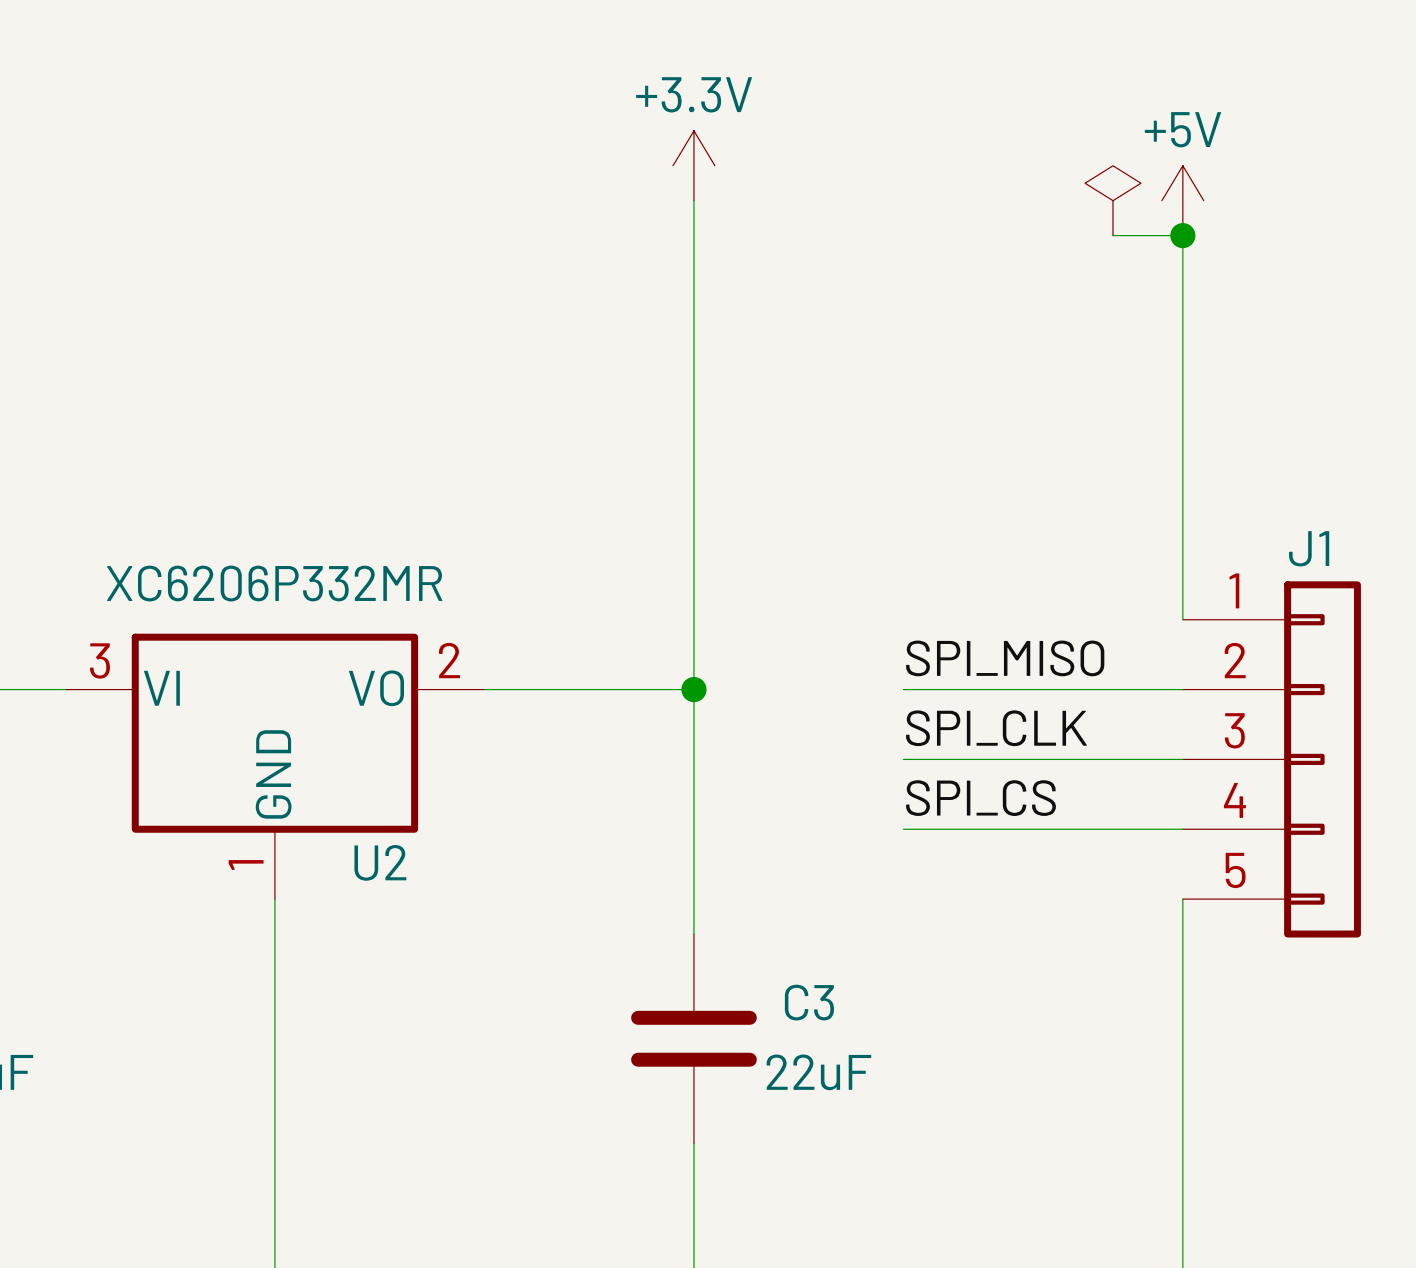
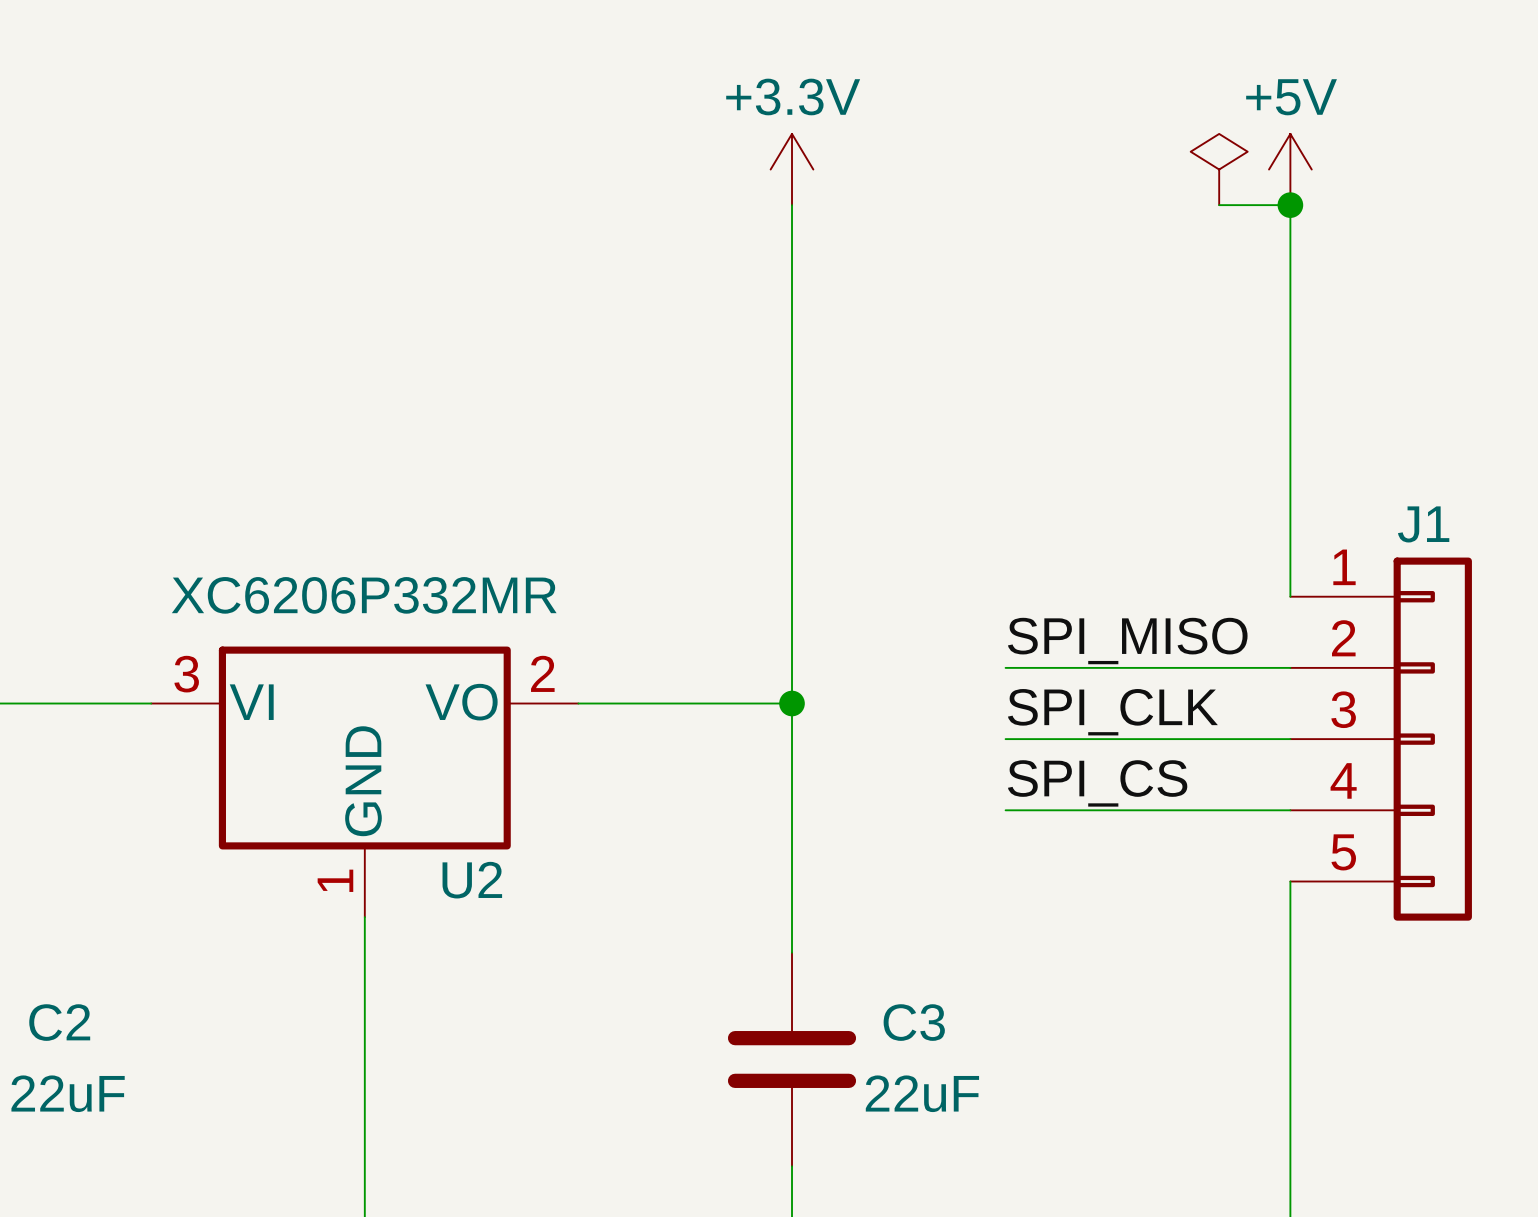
power symbol position: (1113, 200) -> (1219, 169)
power symbol position: +5V (1182, 200) -> +5V (1290, 169)
wire: (1113, 235) (1182, 235) -> (1219, 205) (1290, 205) (1290, 240)
junction position: (1182, 235) -> (1290, 205)
wire: (1182, 584) (1182, 619) -> (1290, 881) (1290, 917)
label position: SPI_MISO (1005, 658) -> SPI_MISO (1127, 641)
wire: (903, 689) (1182, 689) -> (1005, 667) (1290, 667)
label position: SPI_CLK (996, 728) -> SPI_CLK (1112, 712)
wire: (903, 759) (1182, 759) -> (1005, 739) (1290, 739)
J1 position: (1271, 759) -> (1381, 739)
label position: SPI_CS (981, 798) -> SPI_CS (1097, 783)
wire: (903, 829) (1182, 829) -> (1005, 810) (1290, 810)

